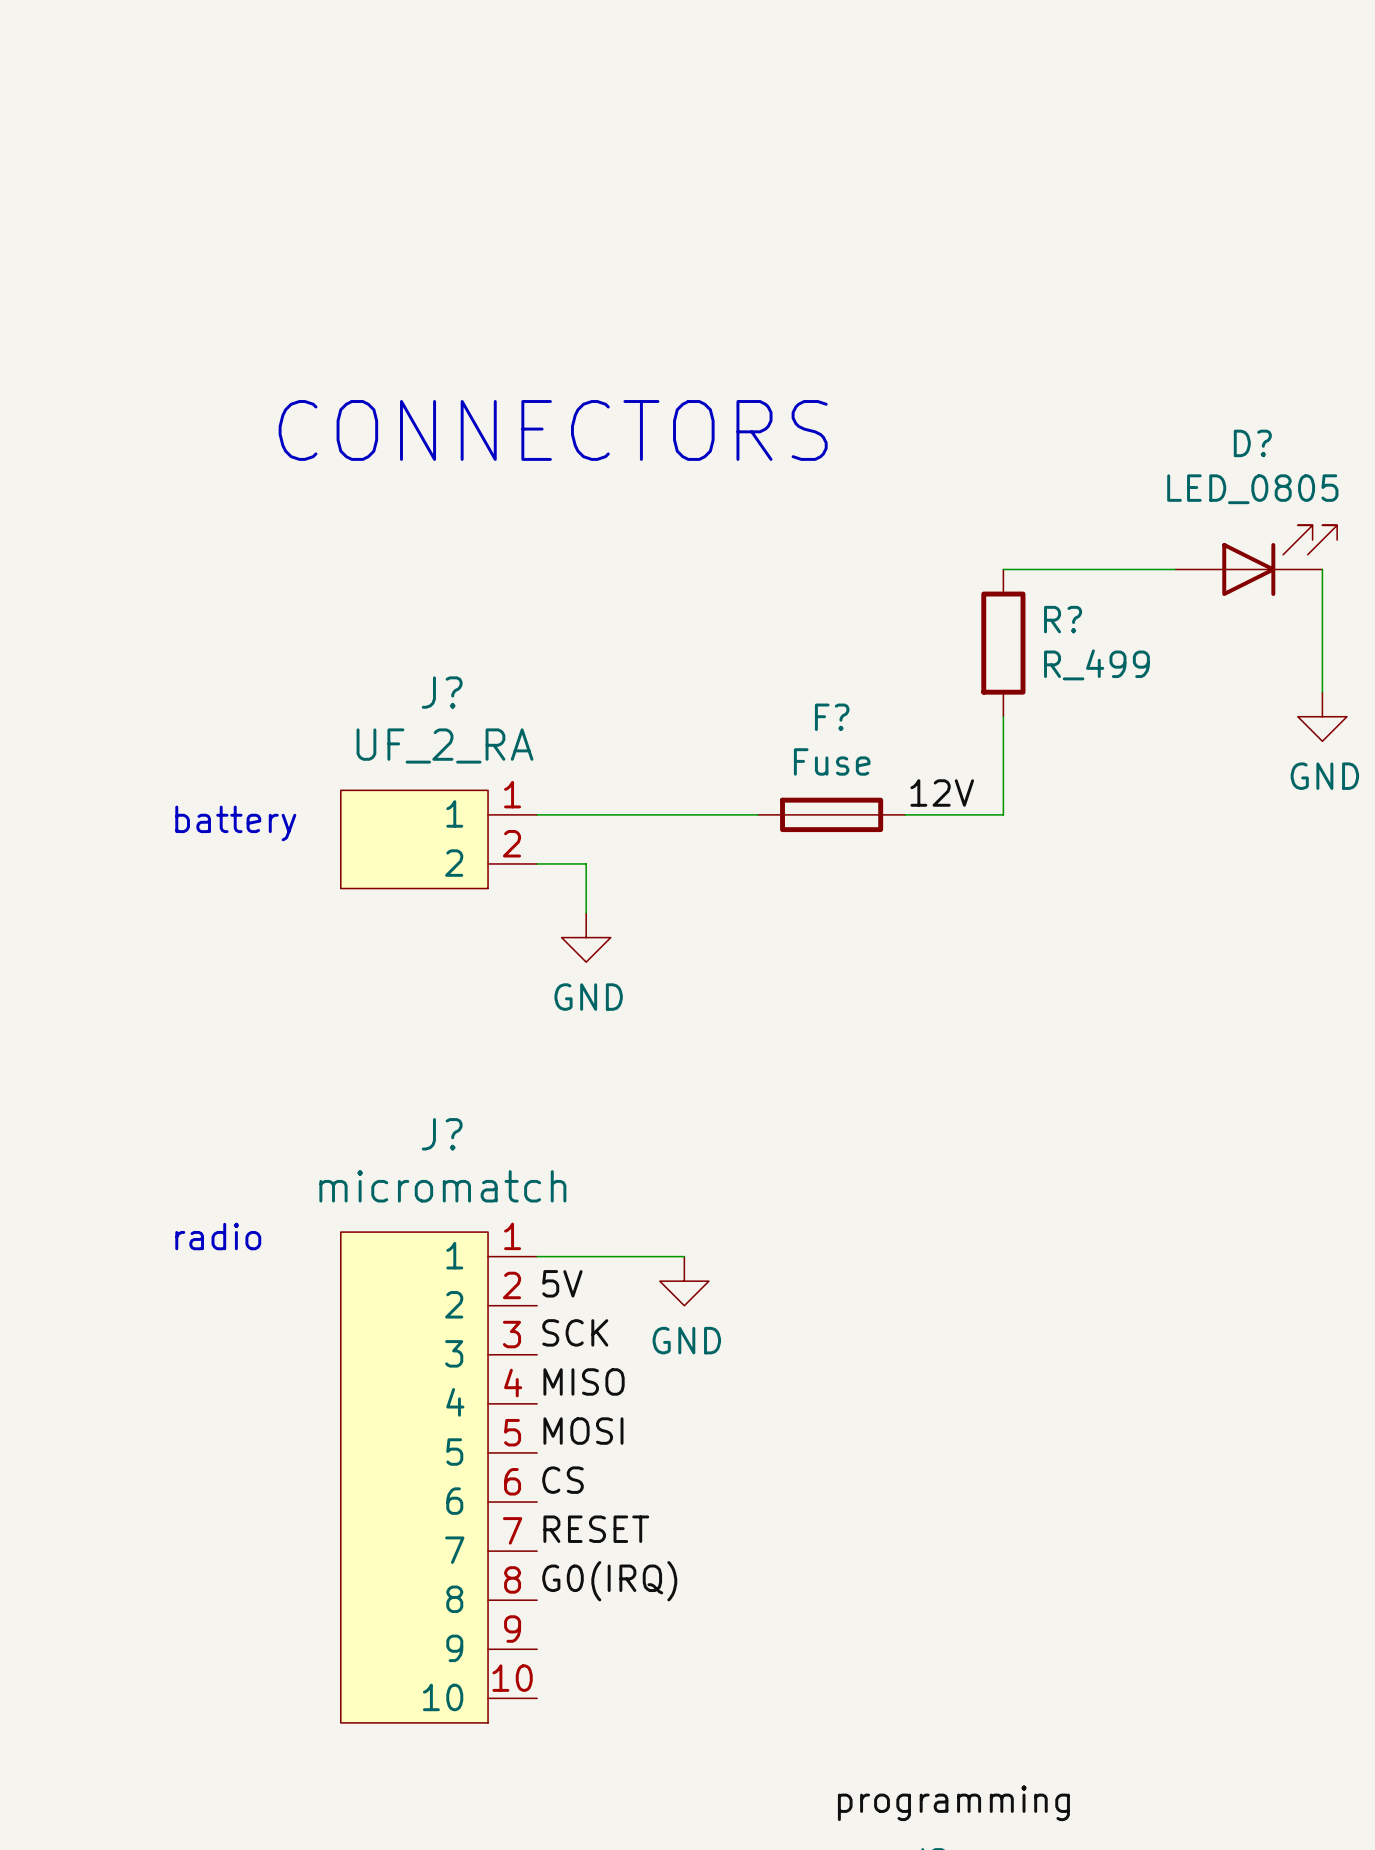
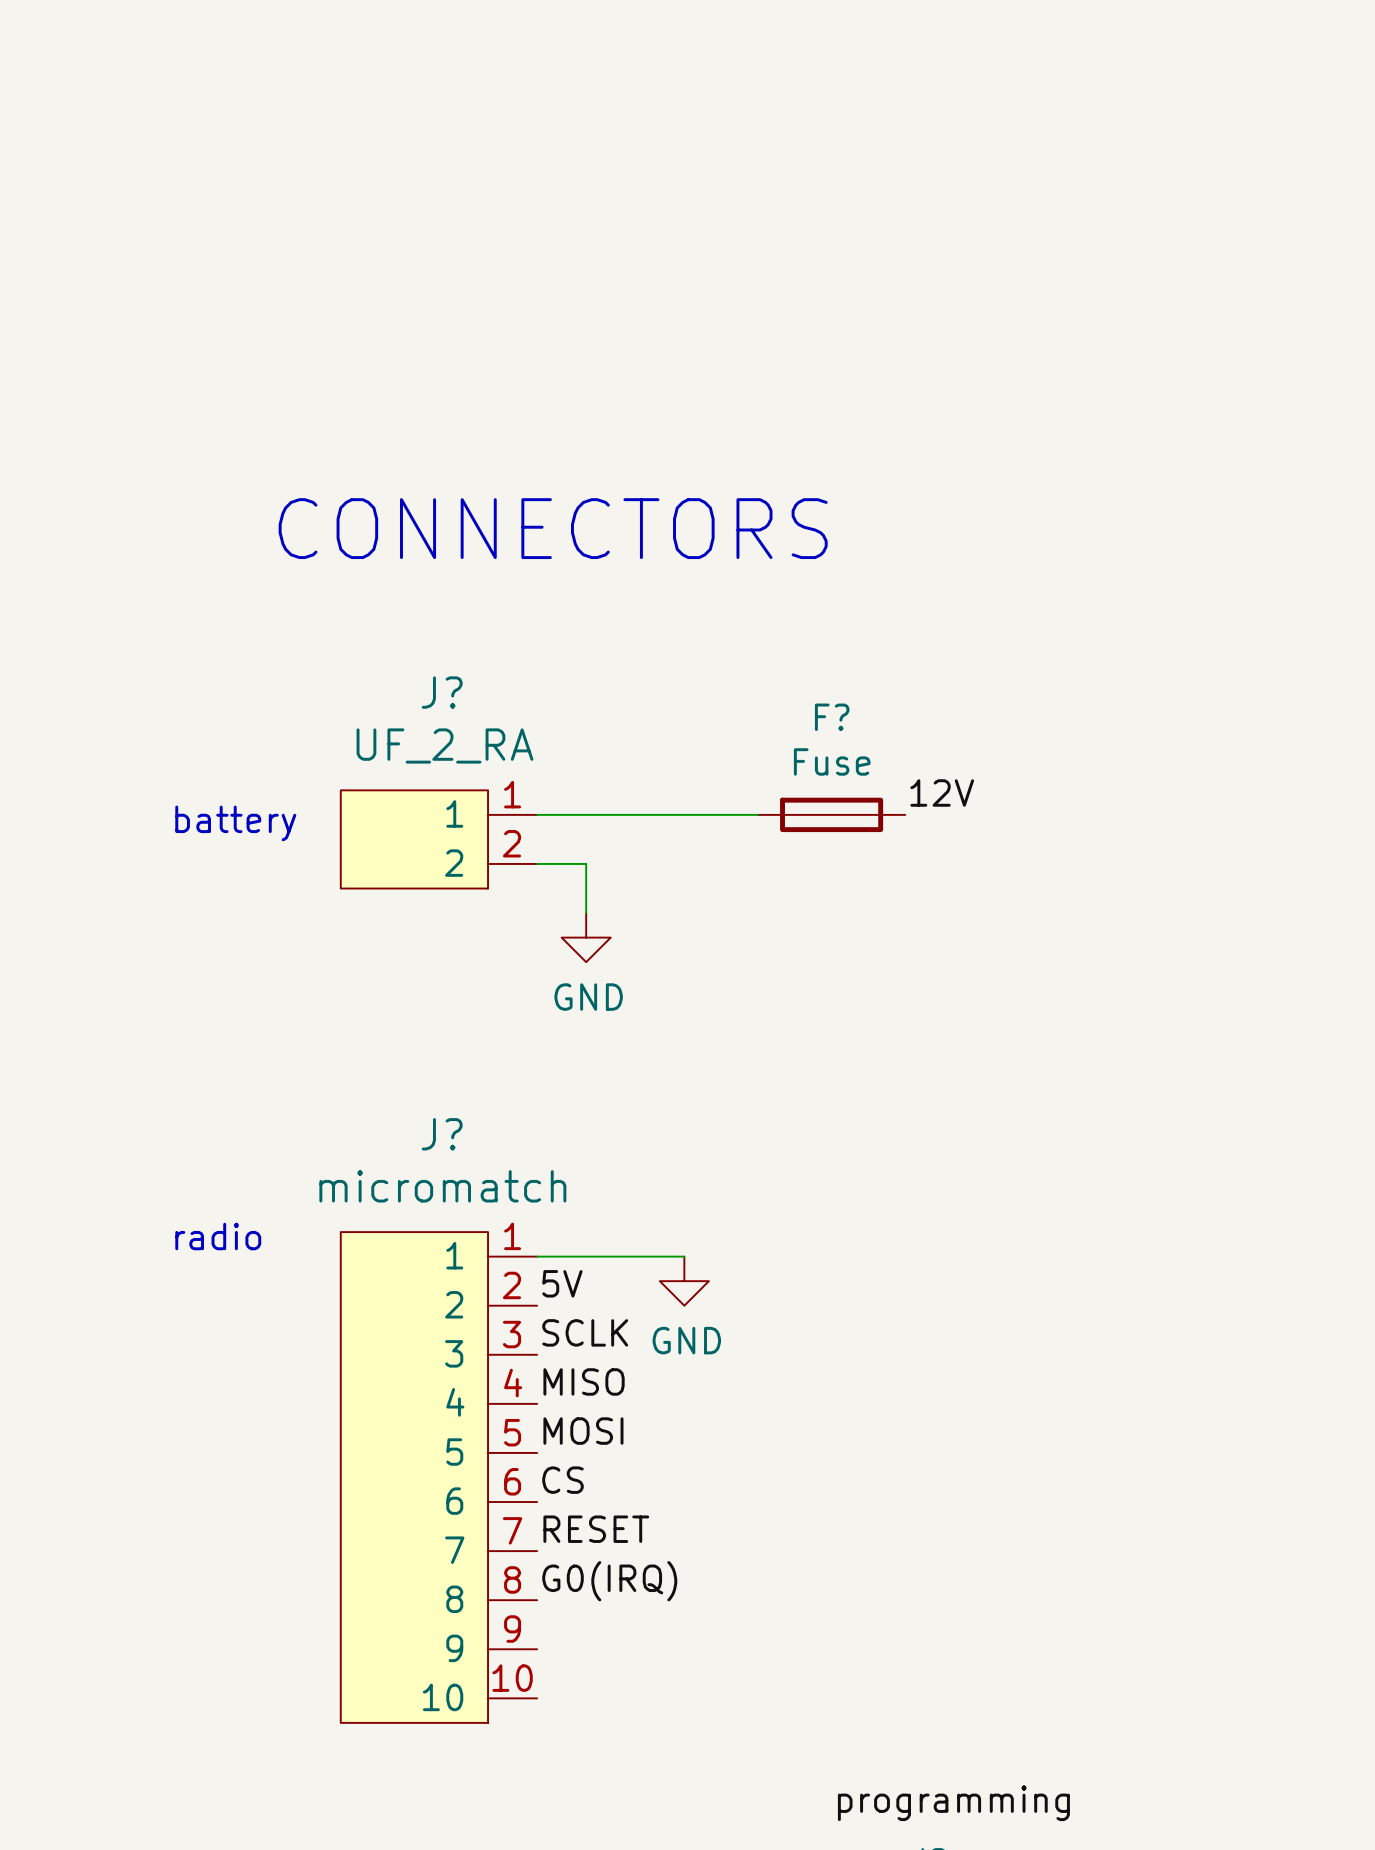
text position: CONNECTORS (553, 430) -> CONNECTORS (553, 528)
D?: LED_0805 (1256, 560) -> none
wire: (1003, 569) (1175, 569) -> none
wire: (1322, 569) (1322, 692) -> none
R?: R_499 (1003, 643) -> none
wire: (1003, 716) (1003, 814) (905, 814) -> none
power symbol: GND (1322, 716) -> none
label: SCK (575, 1332) -> SCLK (585, 1332)

